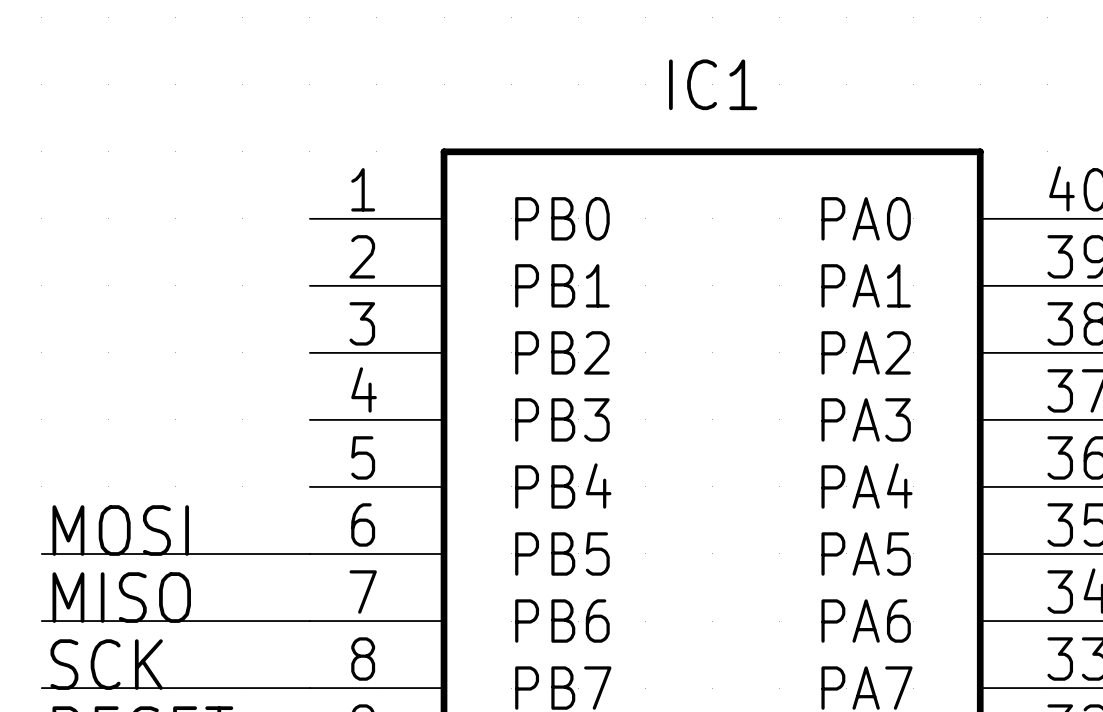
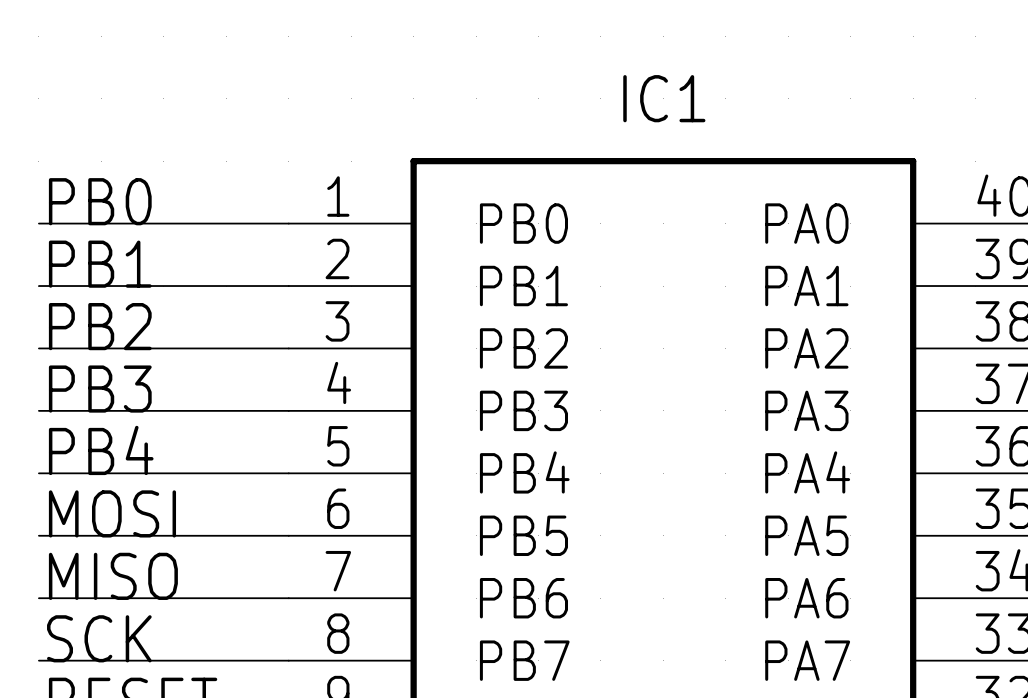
text: none -> PB0 (100, 201)
wire: none -> (38, 223) (288, 223)
text: none -> PB1 (100, 264)
wire: none -> (38, 286) (288, 286)
text: none -> PB2 (100, 326)
wire: none -> (38, 348) (288, 348)
text: none -> PB3 (100, 389)
wire: none -> (38, 410) (288, 410)
text: none -> PB4 (101, 450)
wire: none -> (38, 473) (288, 473)

